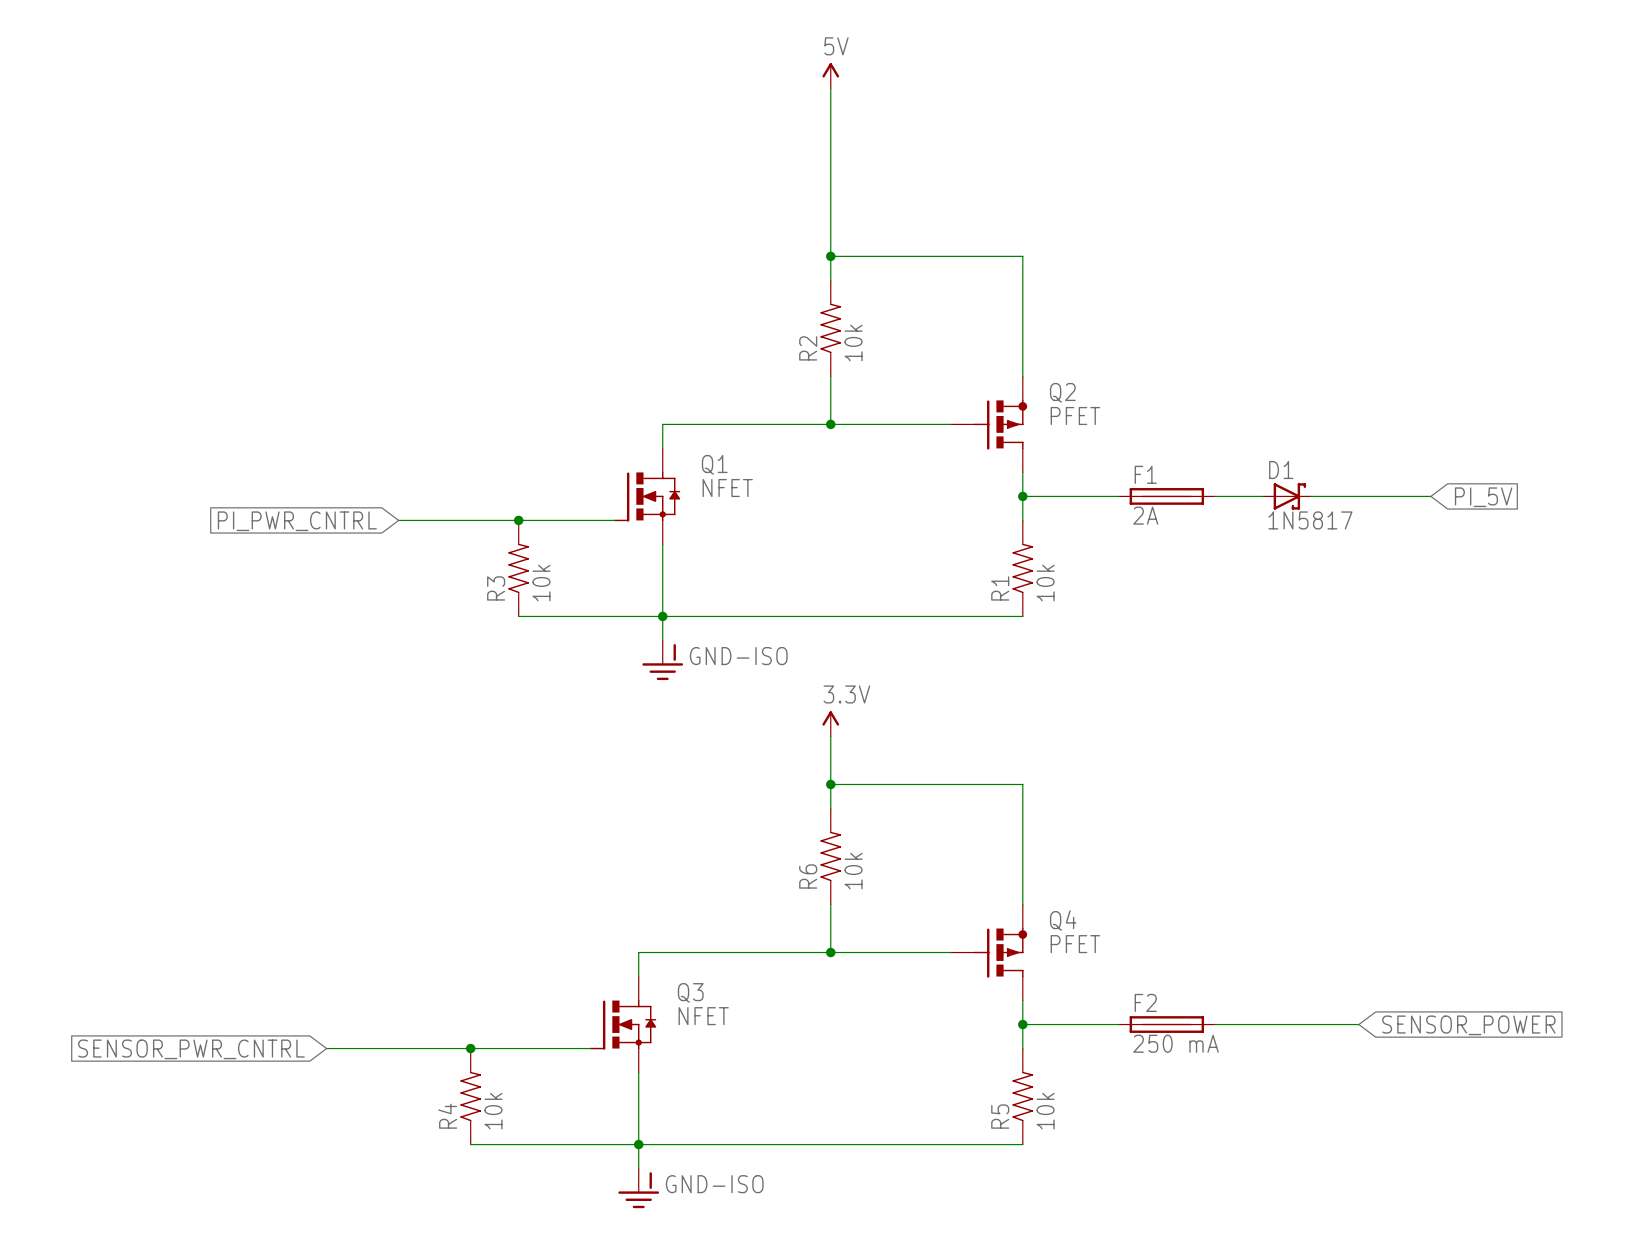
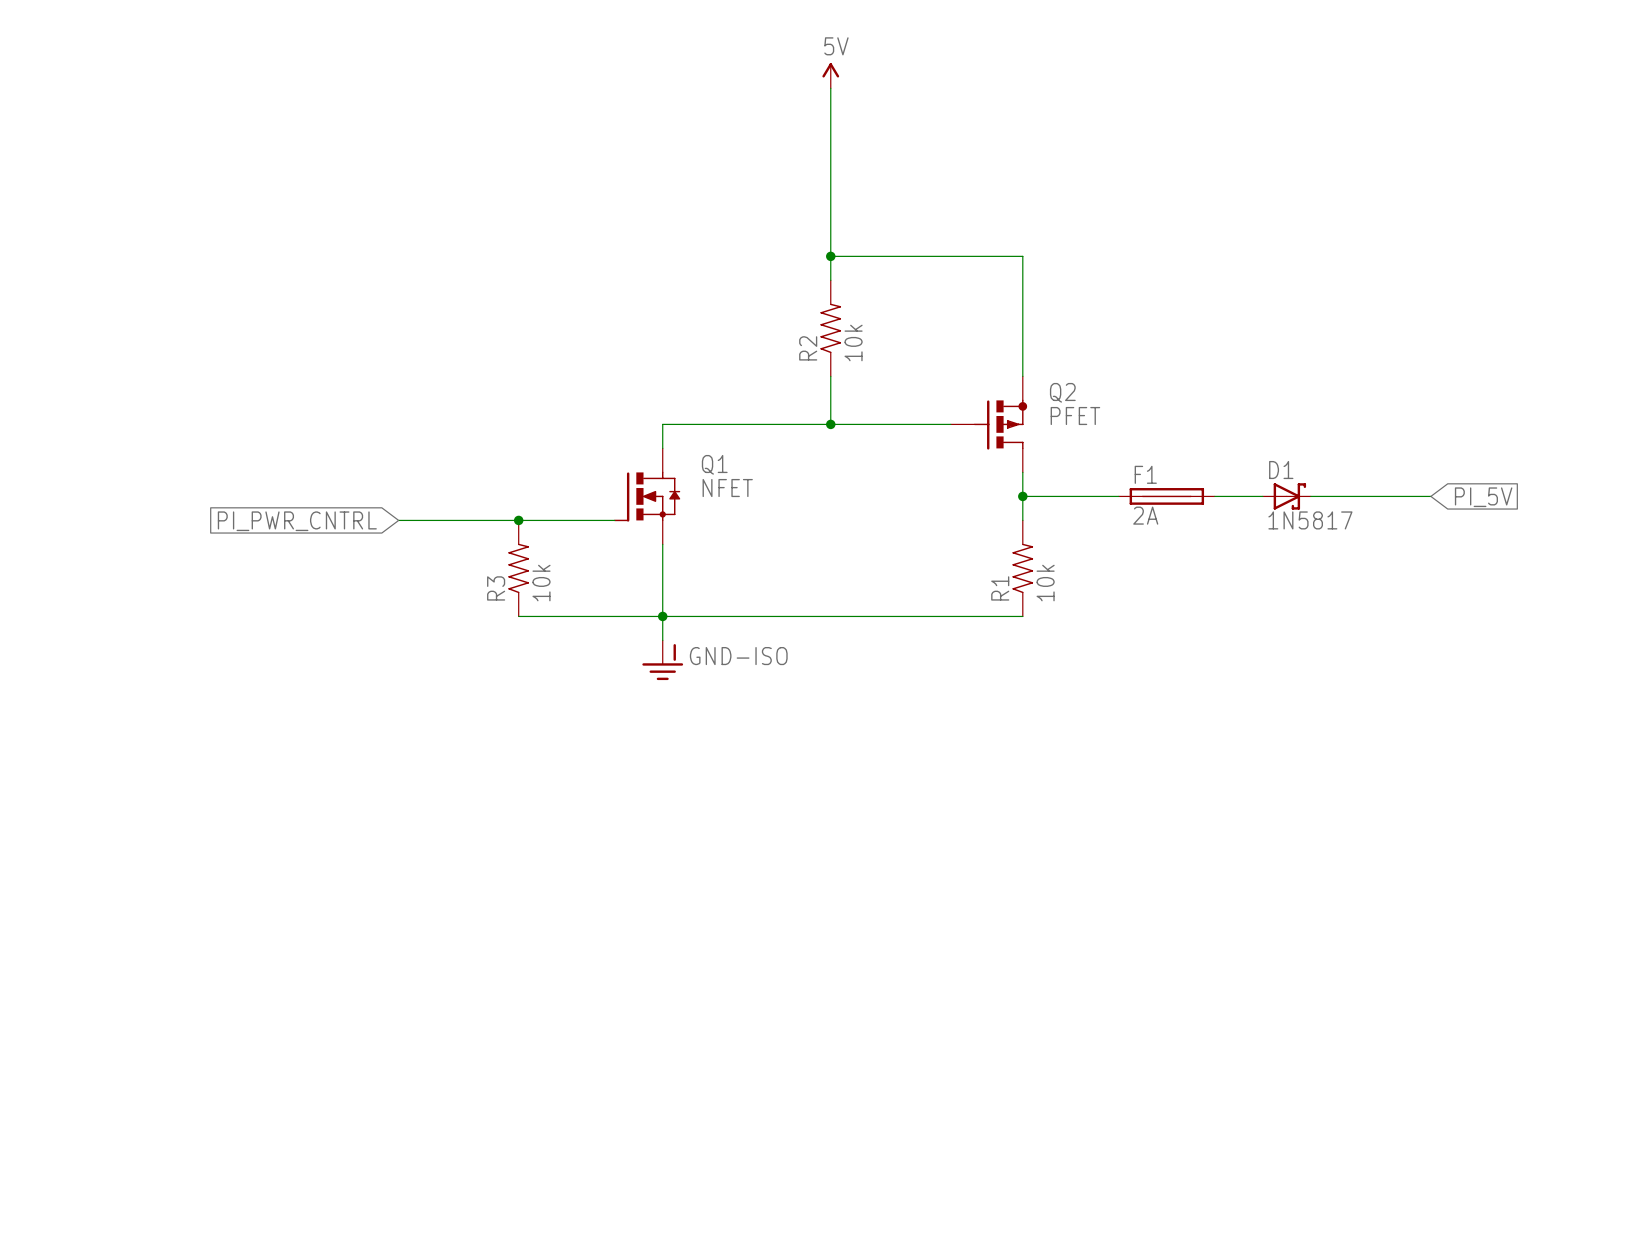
power symbol: 3.3V (830, 723) -> none
wire: (830, 736) (830, 808) -> none
wire: (830, 784) (1022, 784) (1022, 904) -> none
junction: (830, 784) -> none
R6: 10k (830, 856) -> none
wire: (830, 904) (830, 952) -> none
junction: (830, 952) -> none
wire: (950, 952) (638, 952) (638, 976) -> none
Q4: PFET (988, 952) -> none
wire: (1022, 1000) (1022, 1048) -> none
Q3: NFET (623, 1024) -> none
wire: (1022, 1024) (1118, 1024) -> none
junction: (1022, 1024) -> none
F2: 250 mA (1166, 1024) -> none
wire: (1214, 1024) (1358, 1024) -> none
global label: SENSOR_POWER (1468, 1025) -> none
wire: (326, 1048) (590, 1048) -> none
junction: (470, 1048) -> none
global label: SENSOR_PWR_CNTRL (191, 1049) -> none
wire: (638, 1072) (638, 1168) -> none
R4: 10k (470, 1096) -> none
R5: 10k (1022, 1096) -> none
wire: (470, 1144) (1022, 1144) -> none
junction: (638, 1144) -> none
power symbol: GND-ISO (638, 1188) -> none

